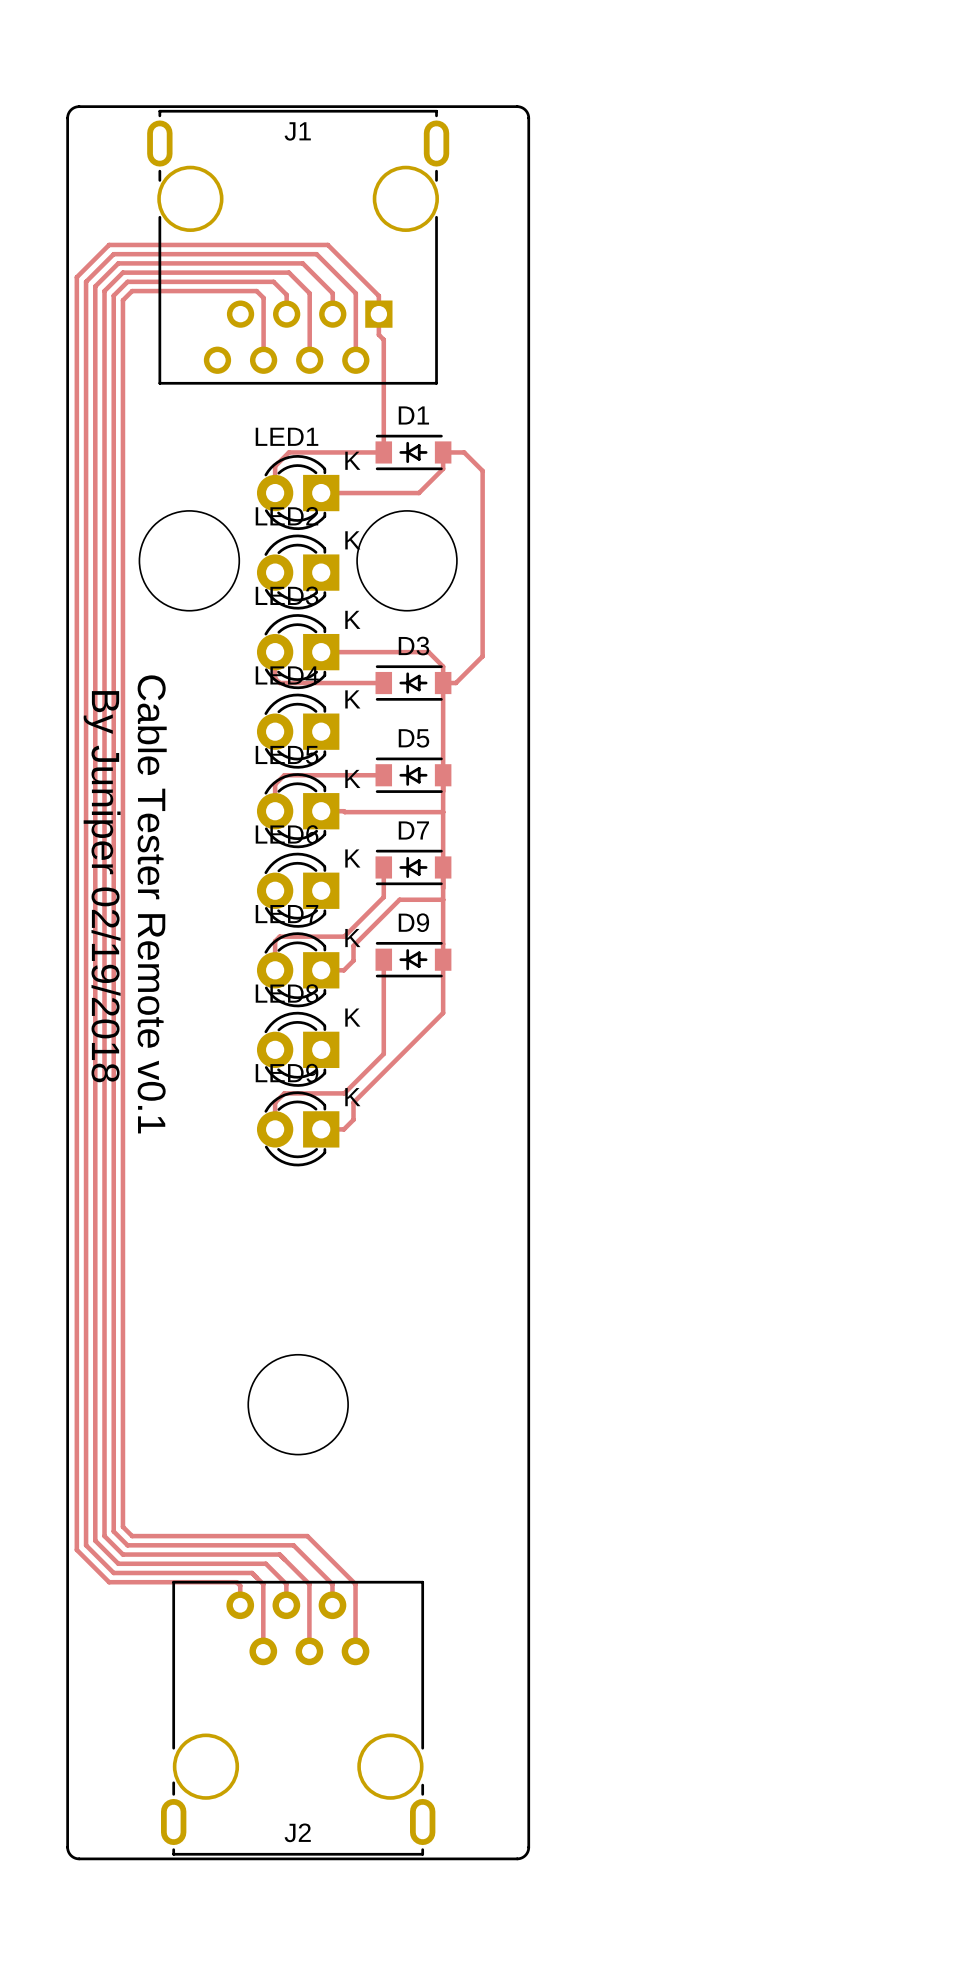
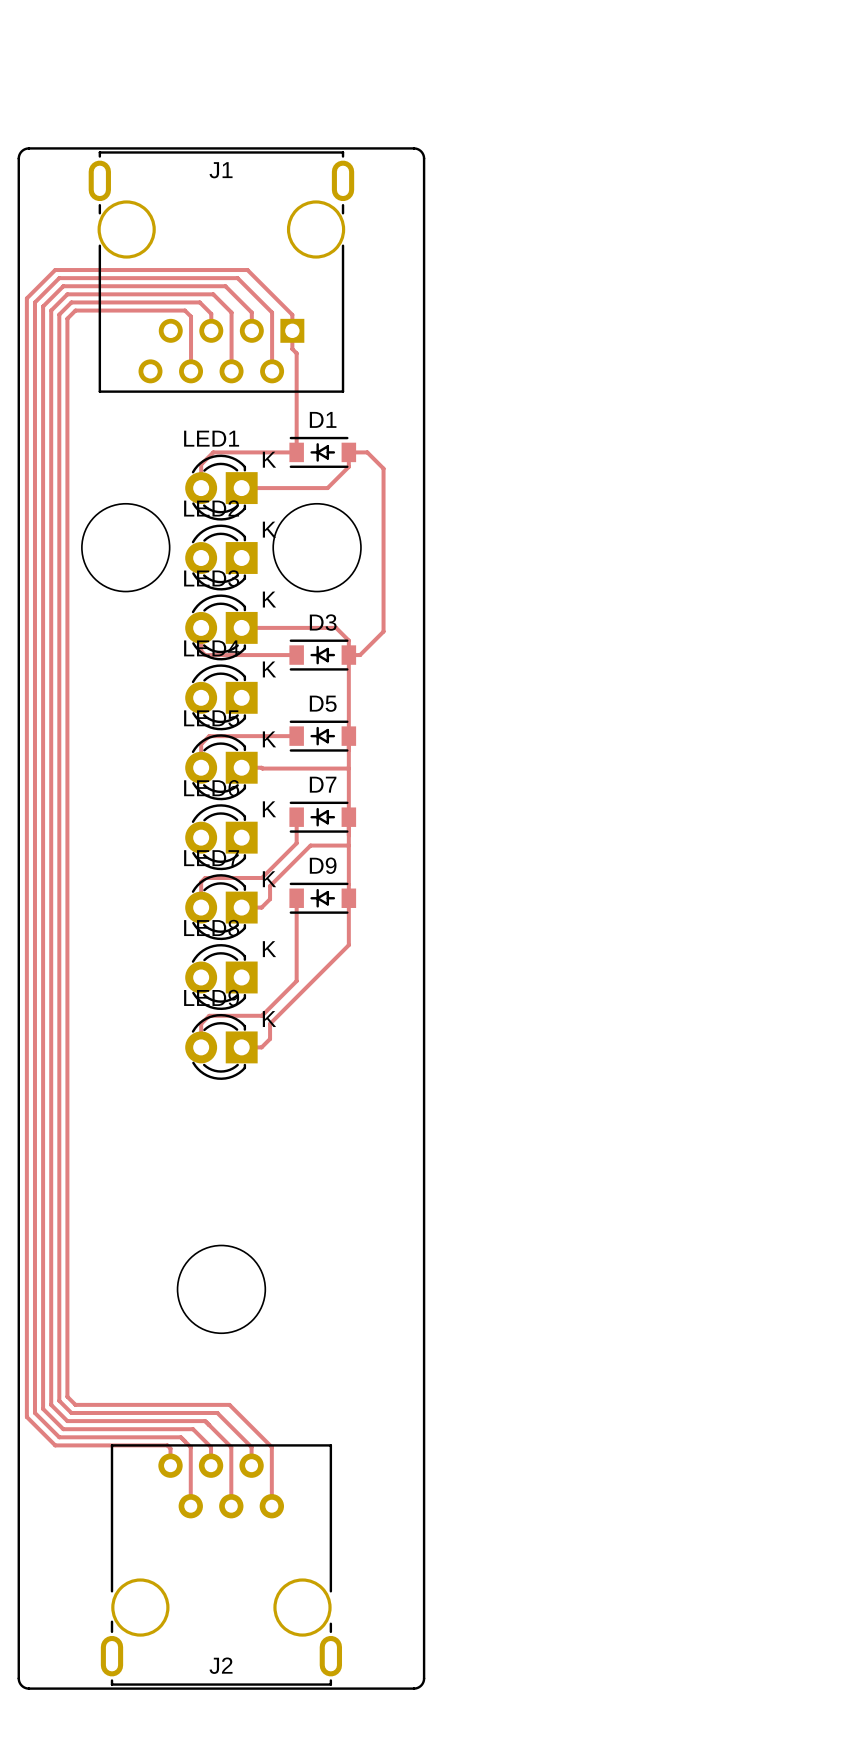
text: By Juniper 02/19/2018 (102, 886) -> none
text: Cable Tester Remote v0.1 (152, 904) -> none

